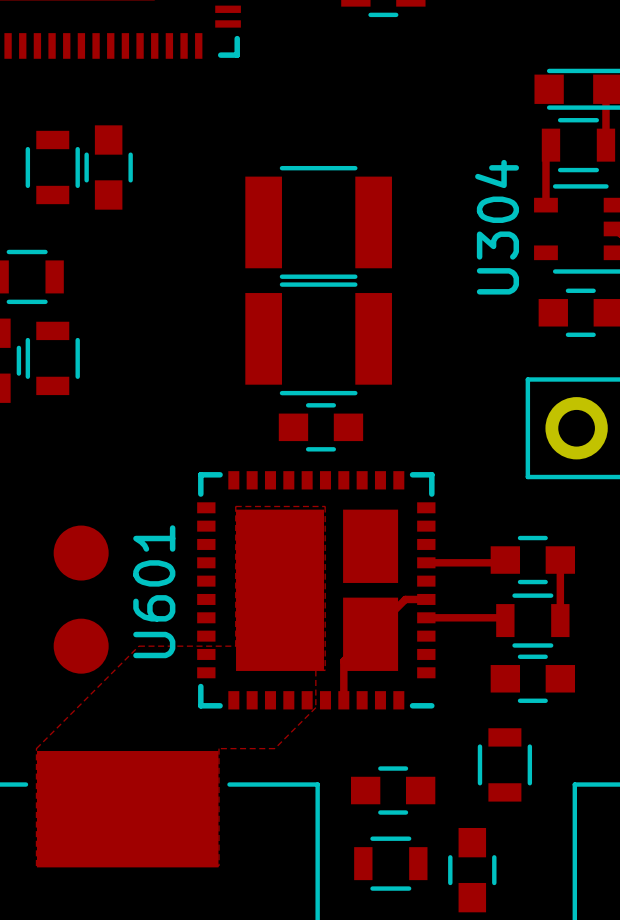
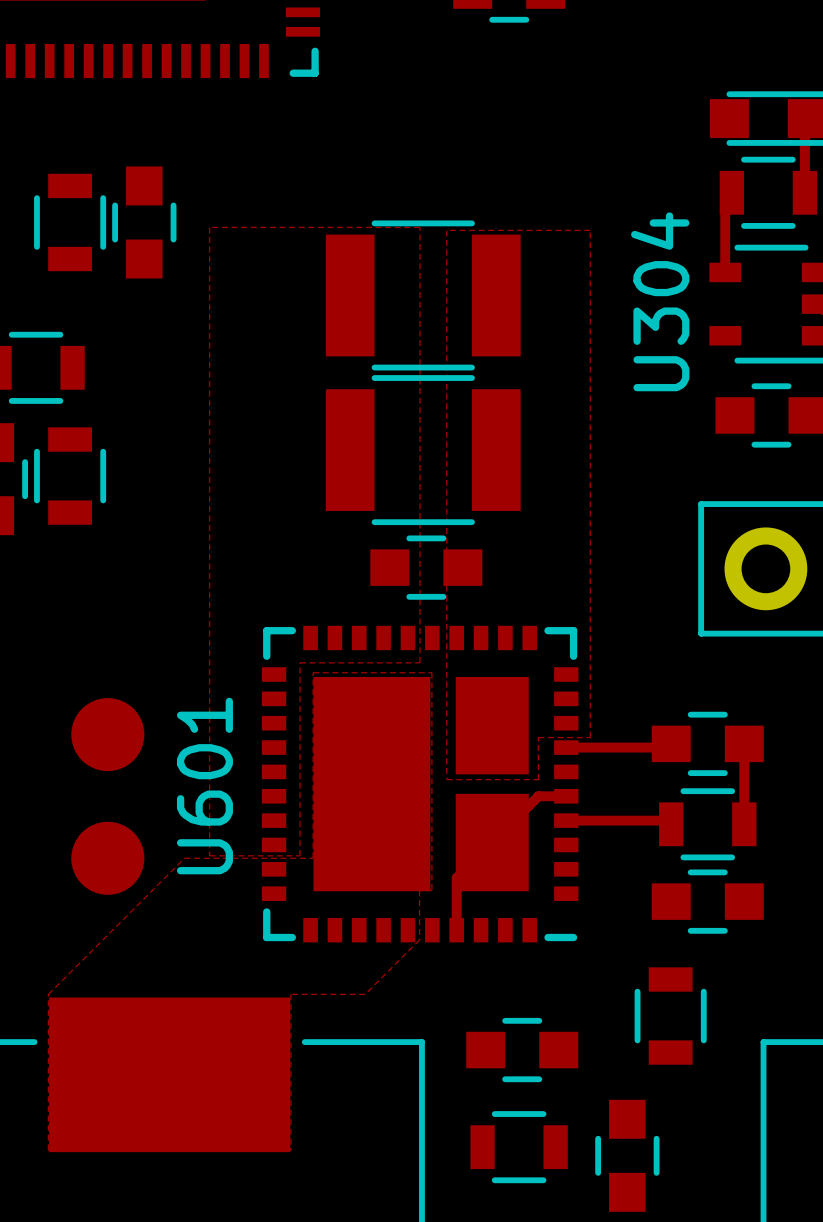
zone outline: none -> (209, 227) (419, 227) (419, 662) (299, 662) (299, 855) (209, 855) (209, 227)
zone outline: none -> (446, 230) (590, 230) (590, 737) (538, 737) (538, 779) (446, 779) (446, 230)

